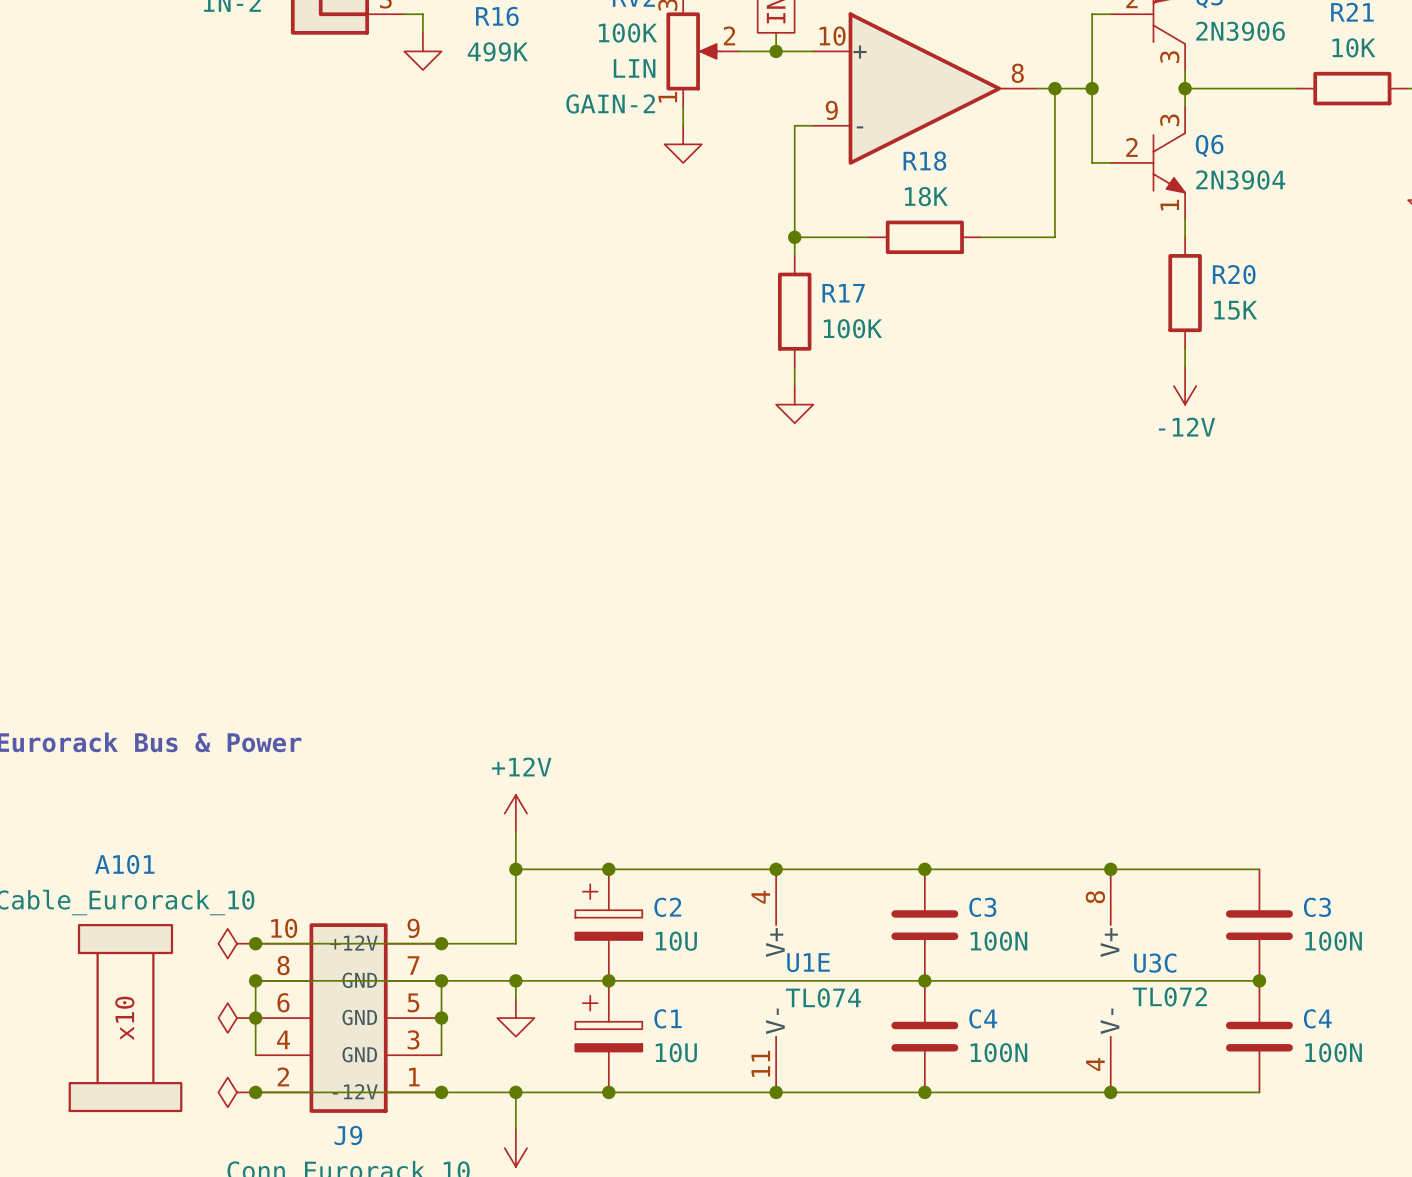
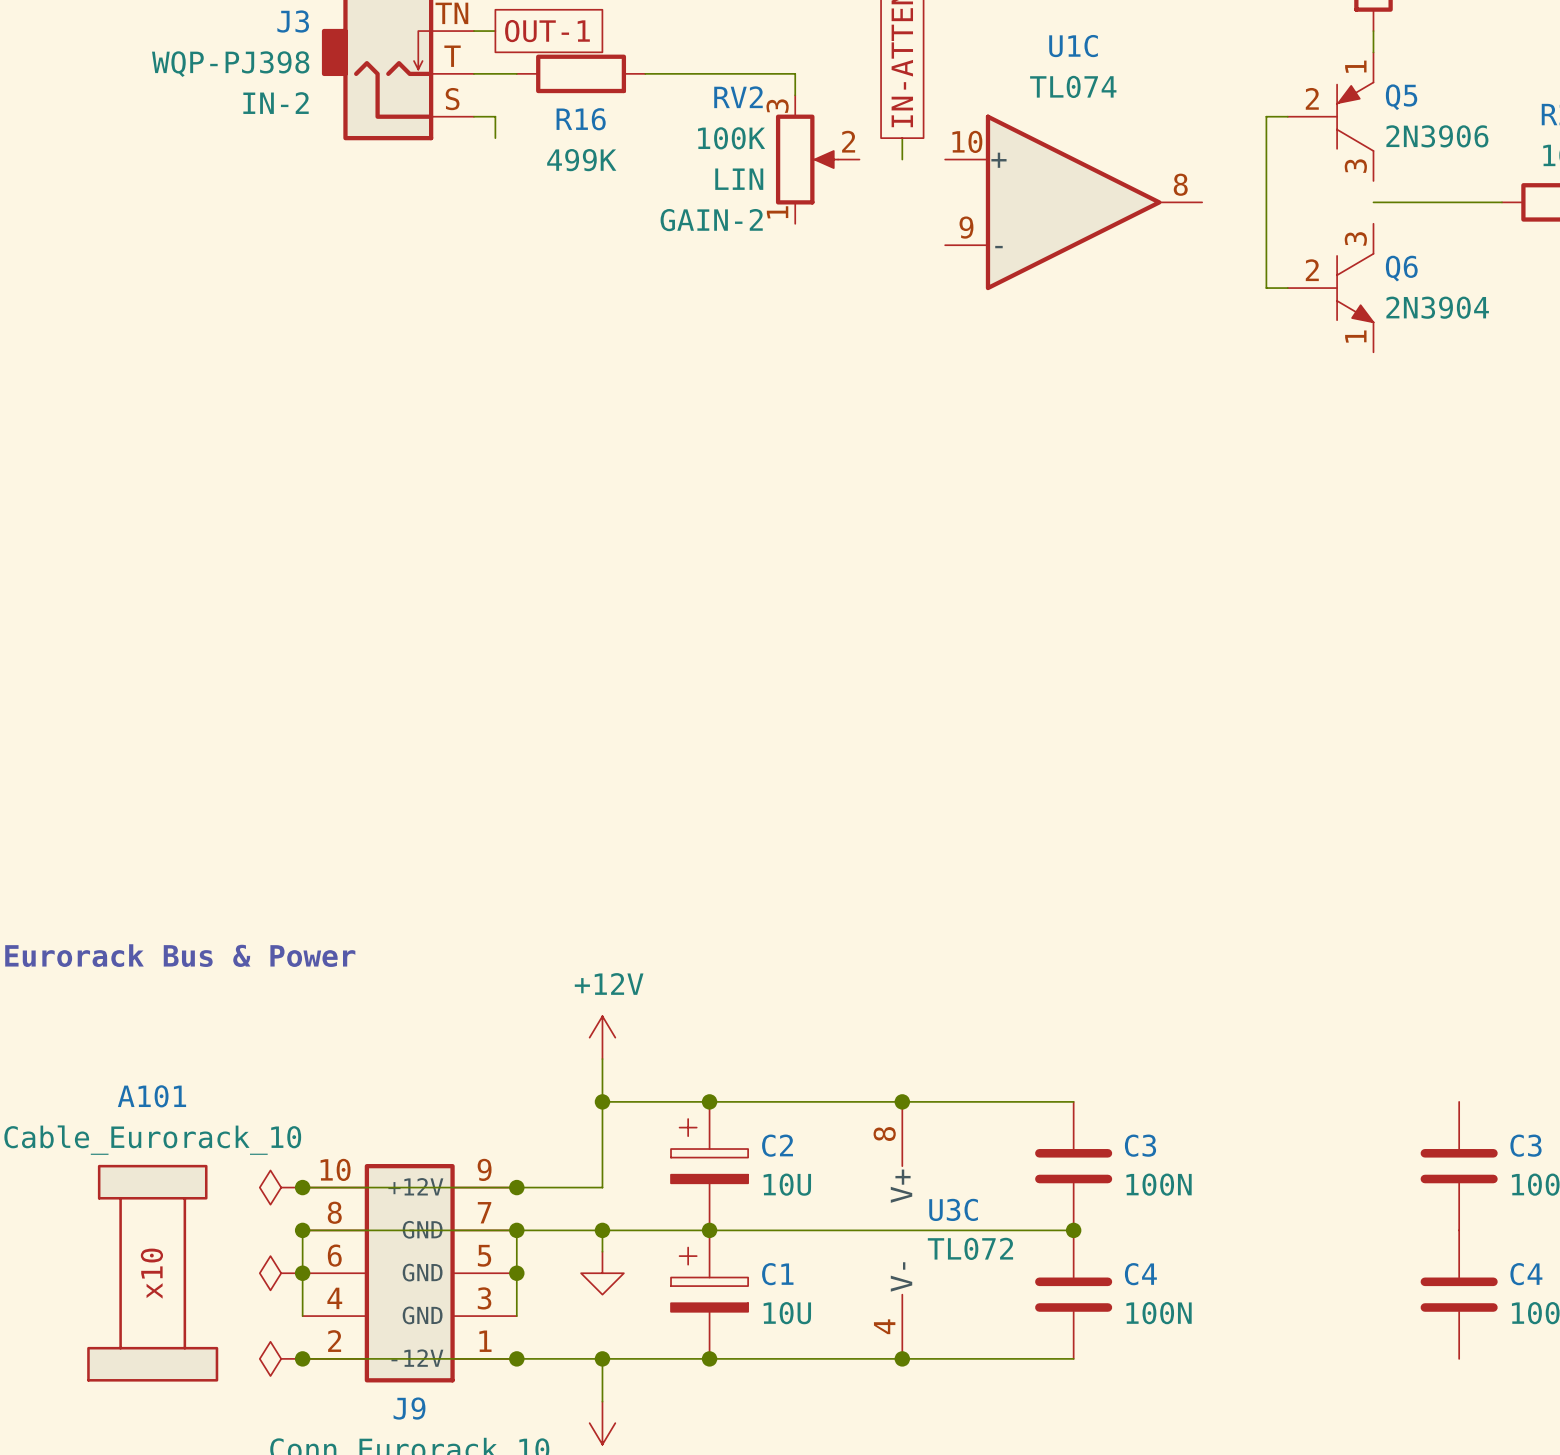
power symbol: (422, 51) -> none
wire: (738, 51) (813, 51) -> none
junction: (776, 51) -> none
wire: (1185, 70) (1185, 107) -> none
wire: (1036, 88) (1092, 88) -> none
wire: (1054, 88) (1054, 237) (980, 237) -> none
junction: (1054, 88) -> none
junction: (1092, 88) -> none
junction: (1185, 88) -> none
wire: (683, 107) (683, 125) -> none
wire: (813, 125) (794, 125) (794, 255) -> none
power symbol: (683, 144) -> none
wire: (1185, 218) (1185, 237) -> none
wire: (794, 237) (869, 237) -> none
junction: (794, 237) -> none
R18: 18K (924, 237) -> none
R20: 15K (1185, 293) -> none
R17: 100K (794, 311) -> none
wire: (1185, 348) (1185, 367) -> none
wire: (794, 367) (794, 386) -> none
power symbol: -12V (1185, 386) -> none
power symbol: (794, 404) -> none
wire: (924, 869) (1259, 869) -> none
junction: (924, 869) -> none
junction: (1110, 869) -> none
U1E: TL074 (776, 980) -> none
wire: (924, 980) (1259, 980) -> none
U3C position: (1110, 980) -> (902, 1230)
junction: (1259, 980) -> none
wire: (924, 1092) (1259, 1092) -> none
junction: (924, 1092) -> none
junction: (1110, 1092) -> none

